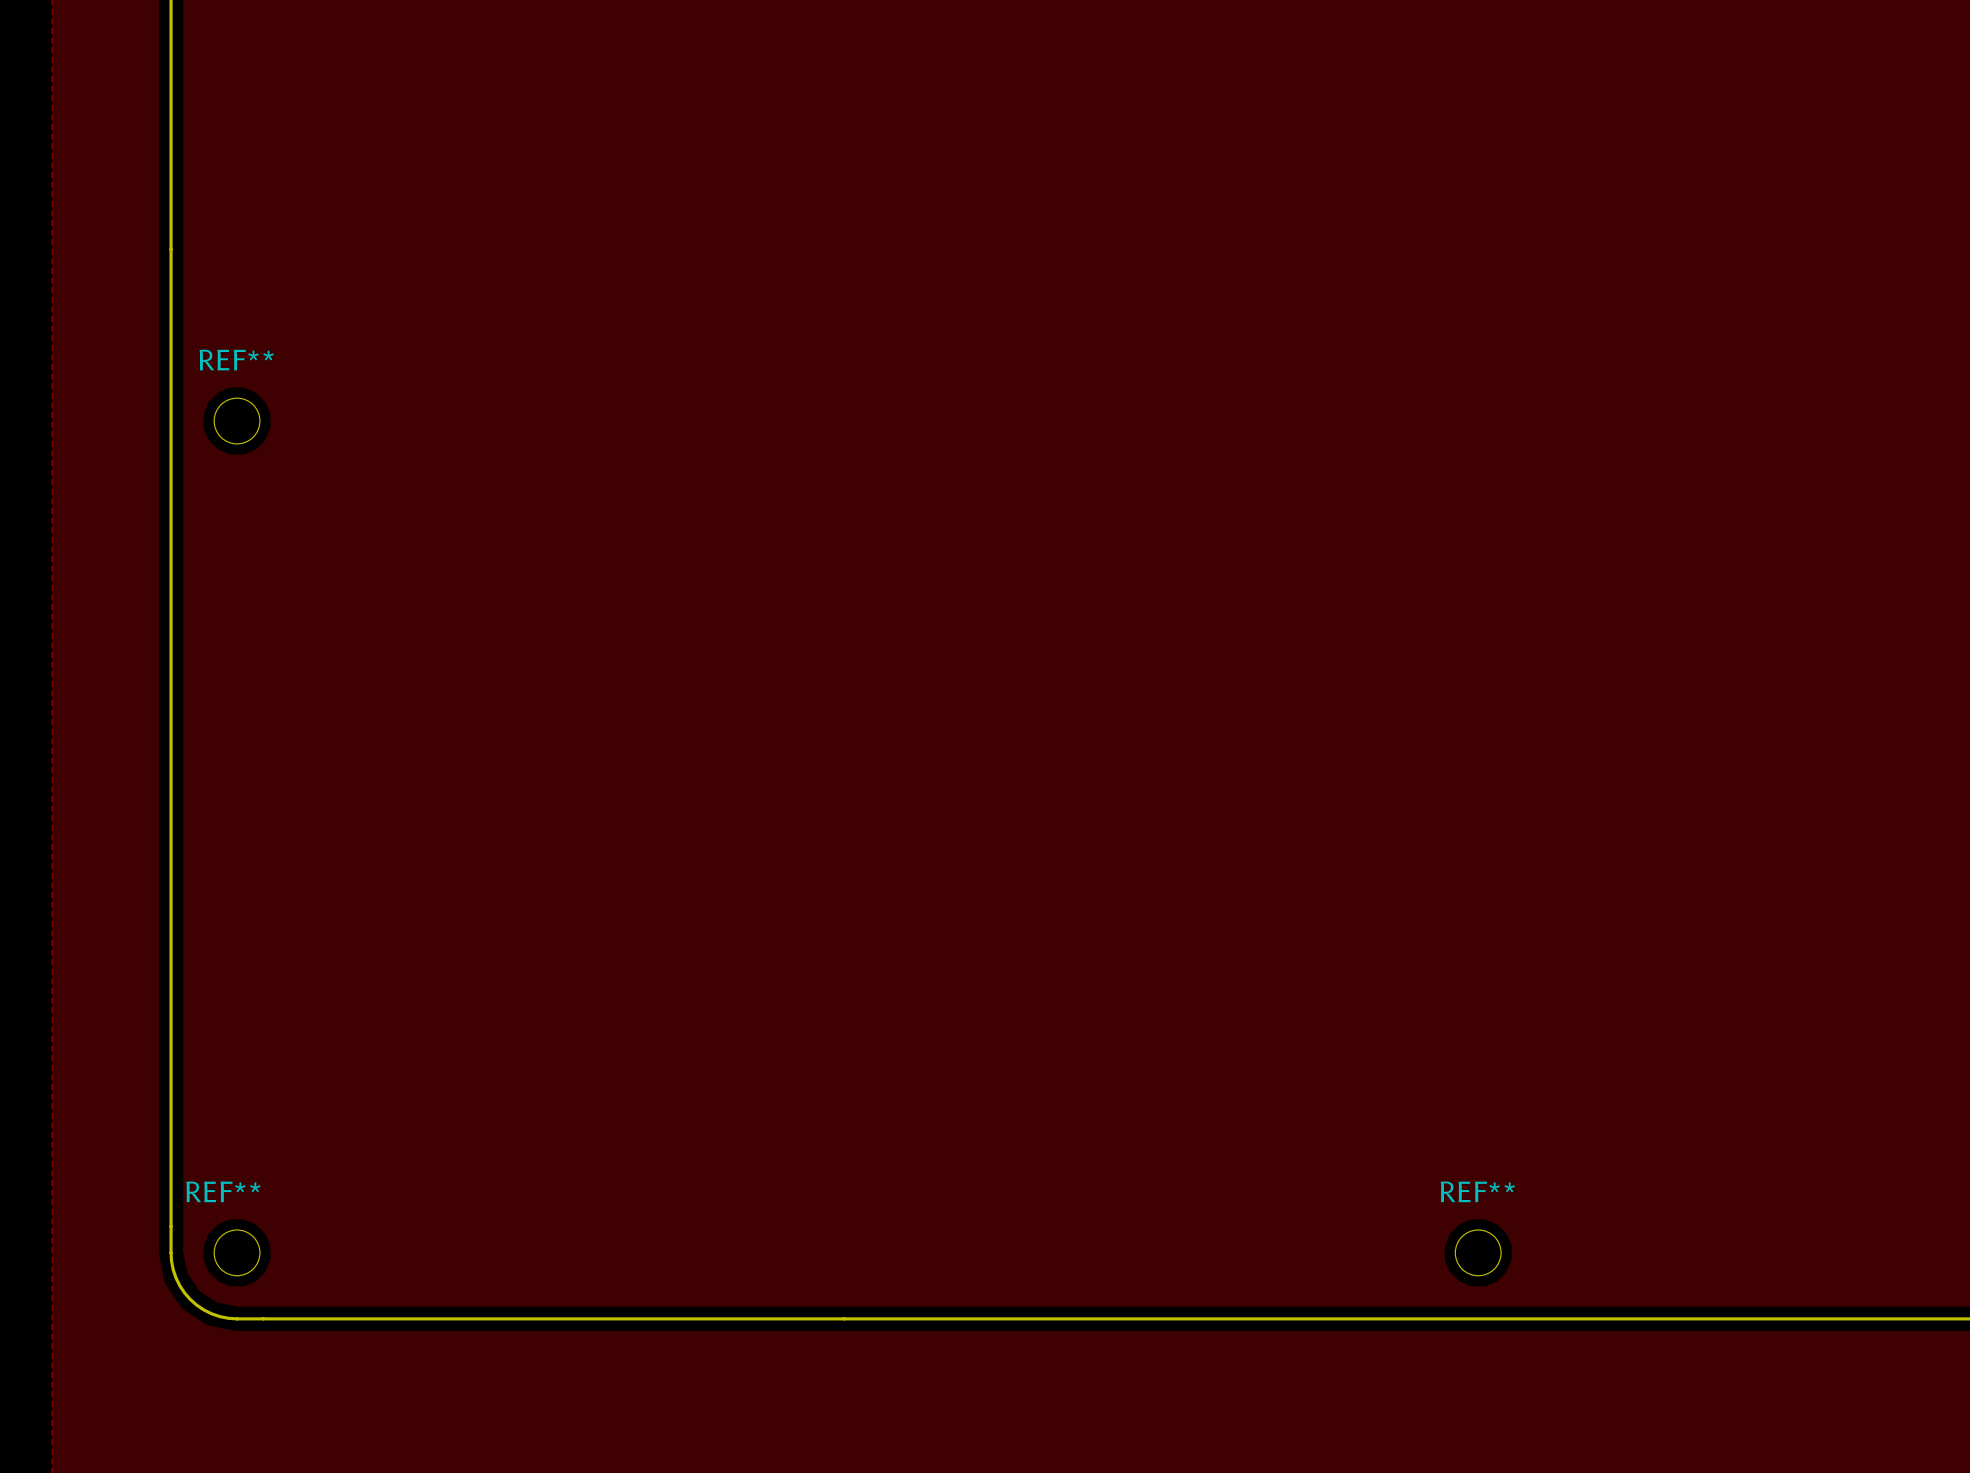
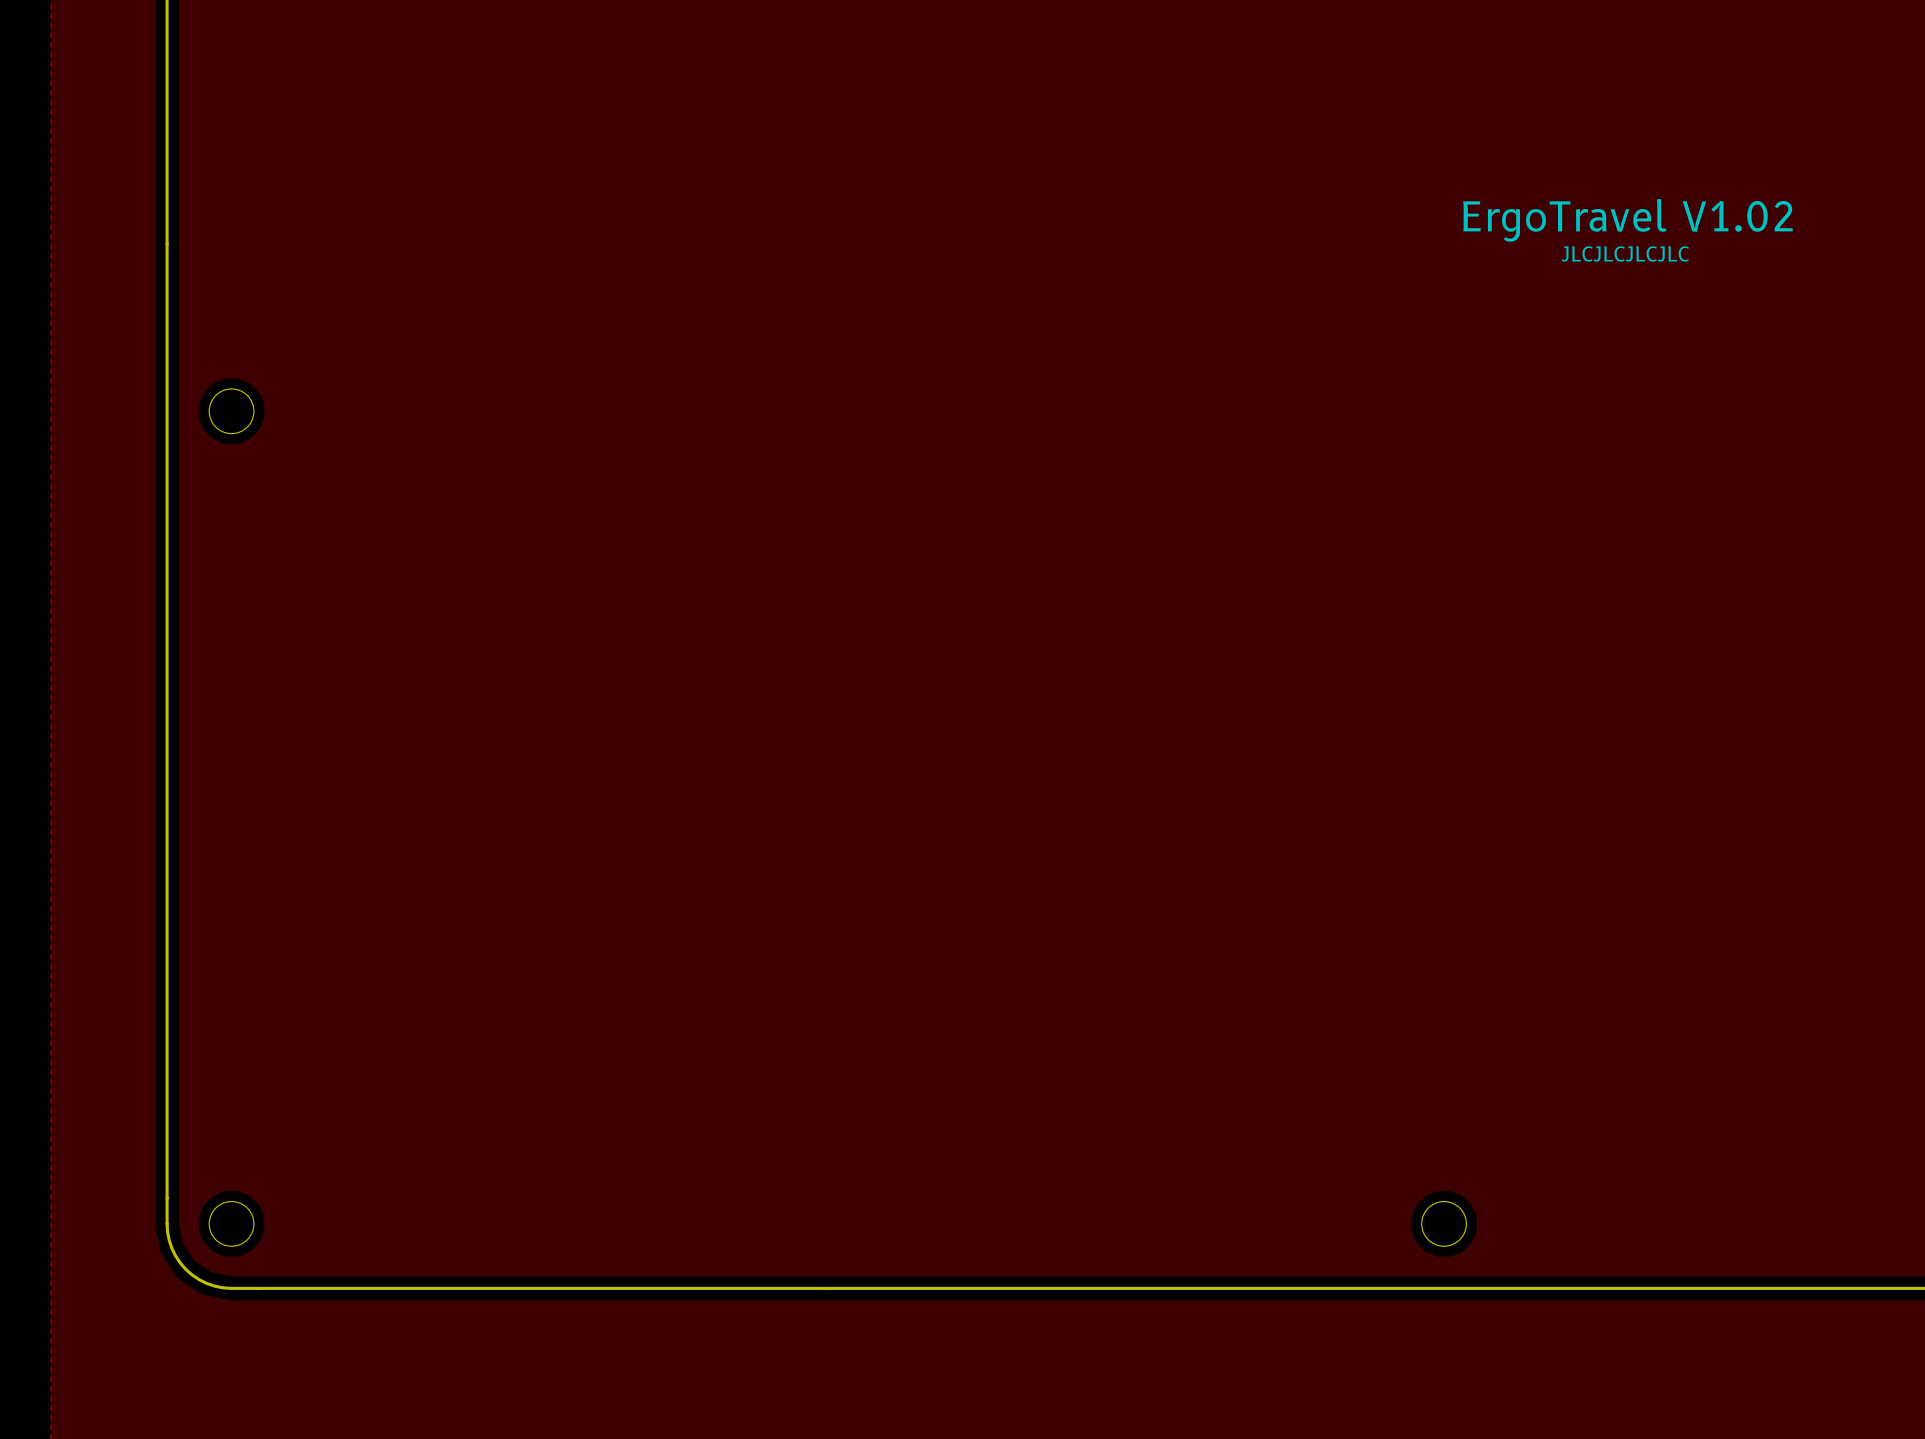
text: none -> ErgoTravel V1.02 (1627, 220)
text: none -> JLCJLCJLCJLC (1625, 253)
REF** name: REF** (236, 360) -> none
REF** name: REF** (223, 1191) -> none
REF** name: REF** (1477, 1191) -> none

